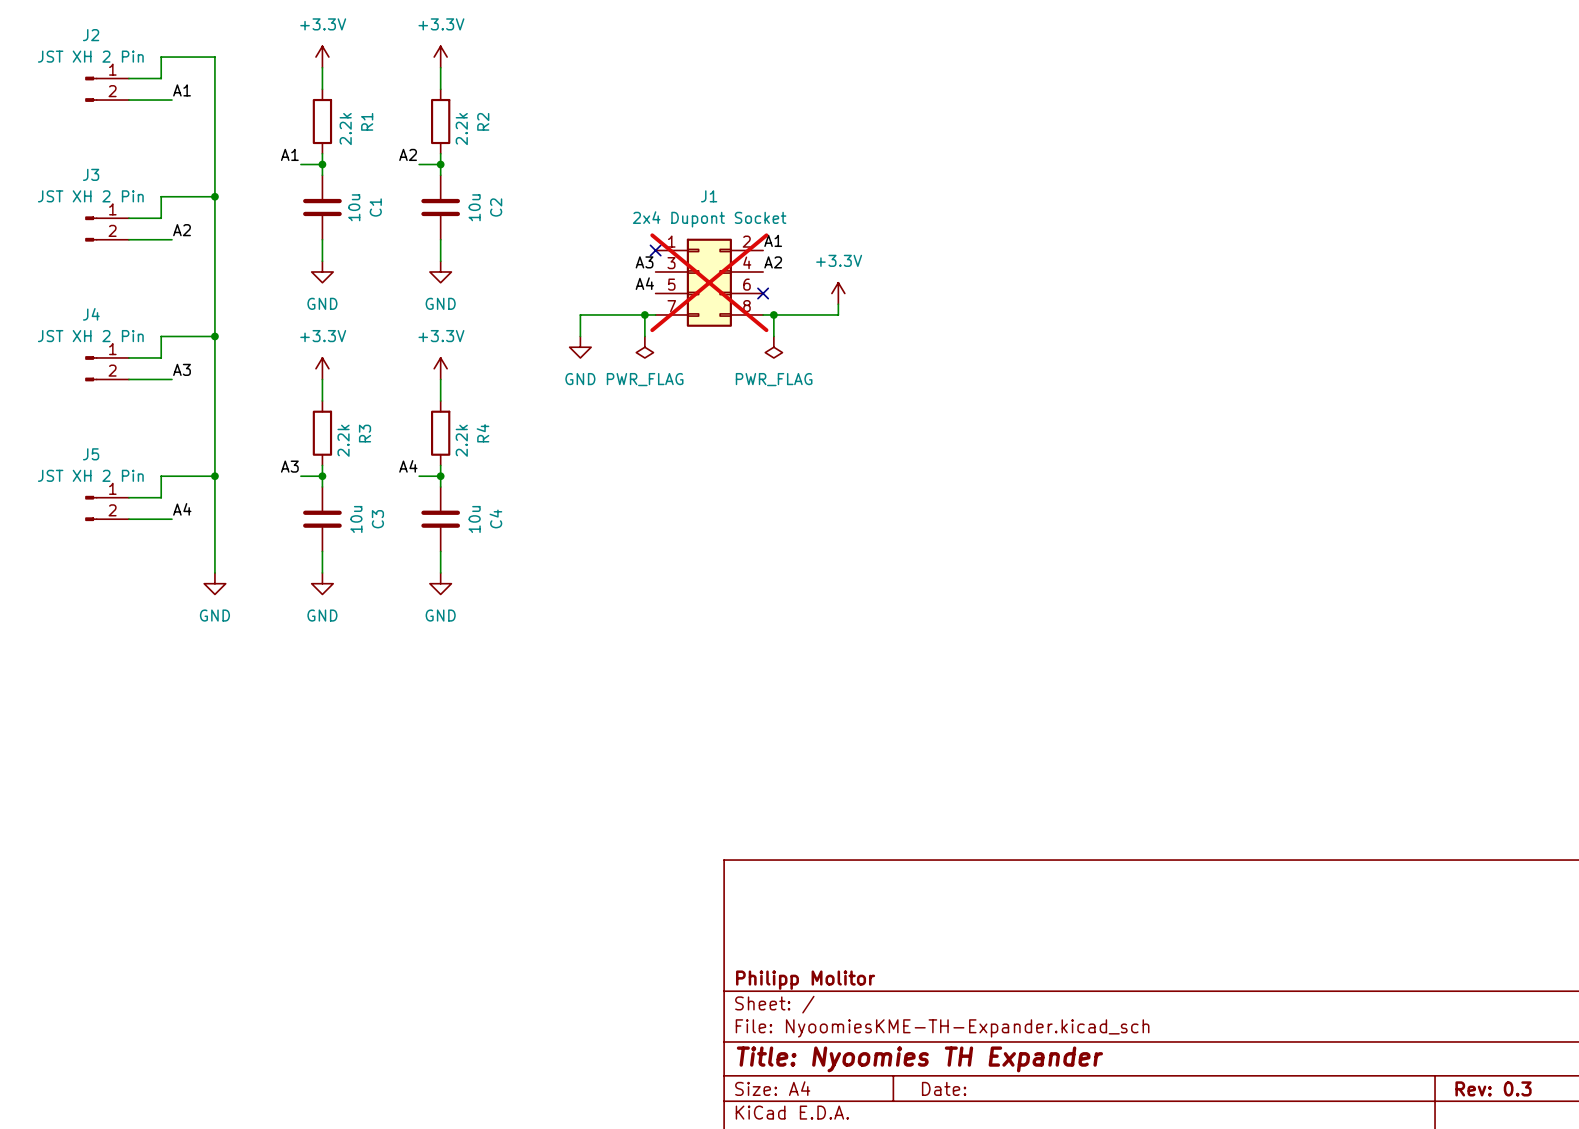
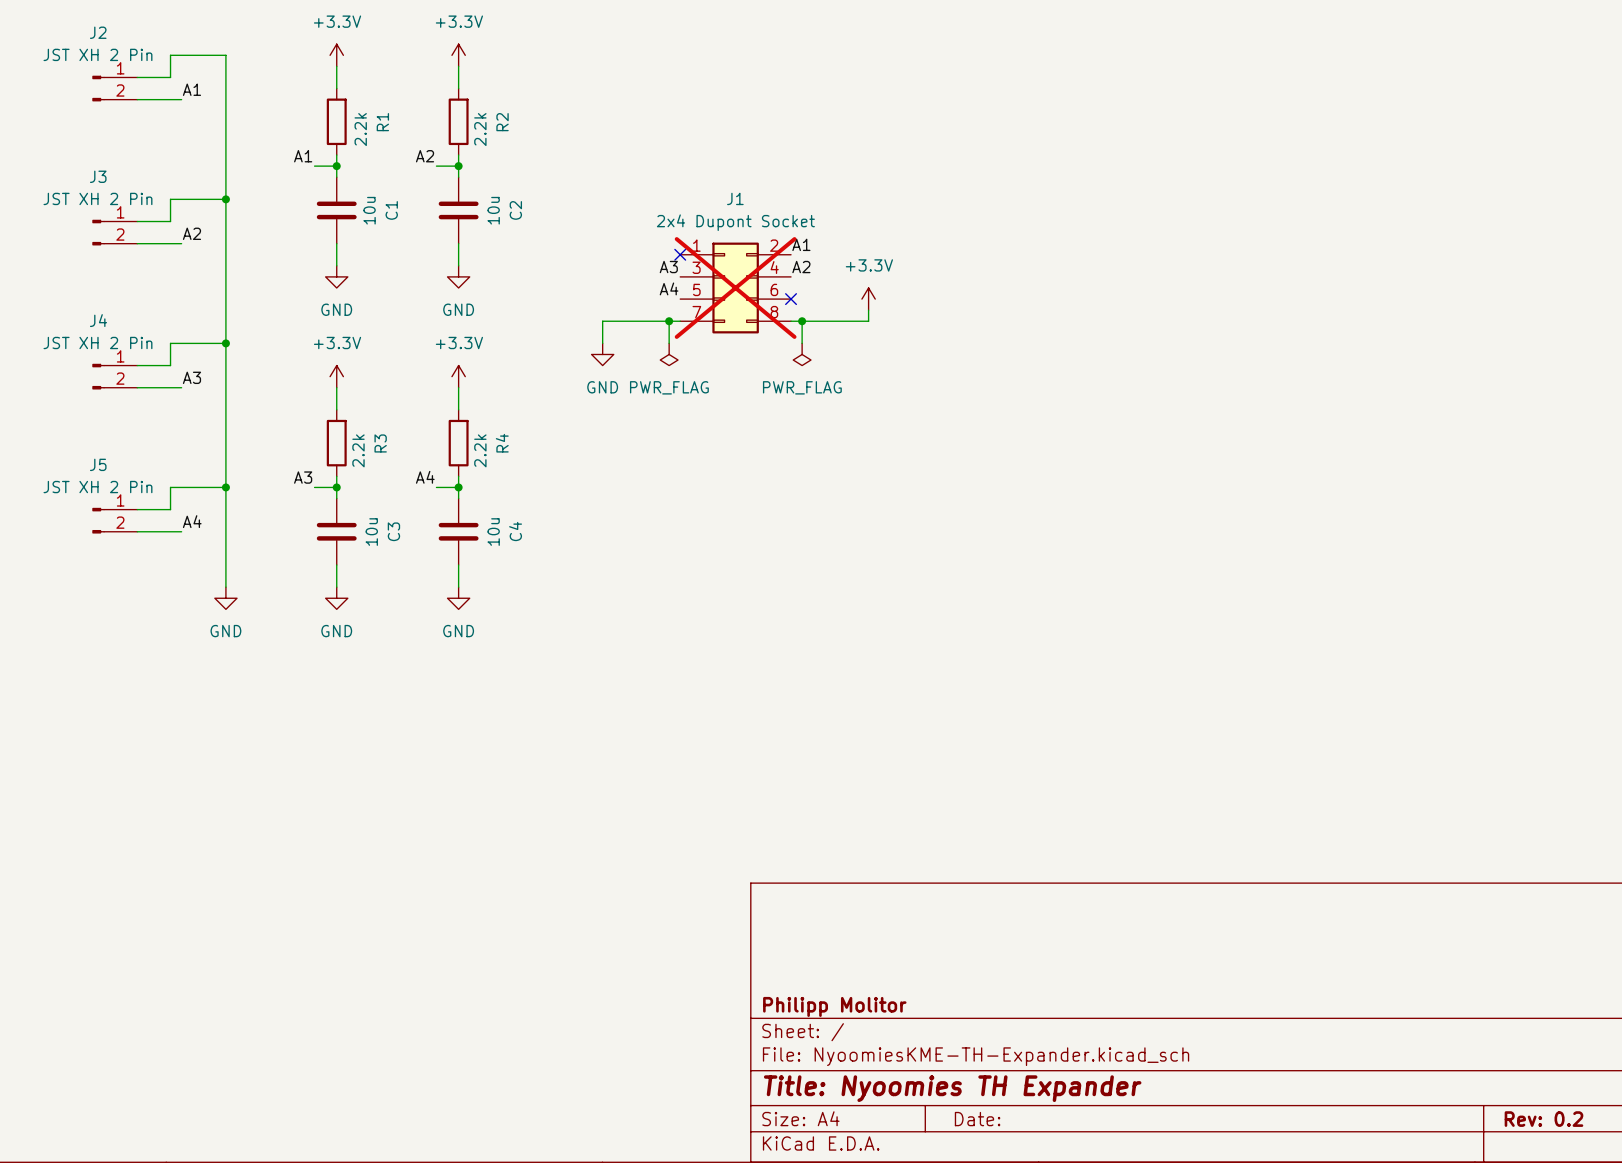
title block: Rev: 0.3 (1493, 1088) -> Rev: 0.2 (1543, 1119)

